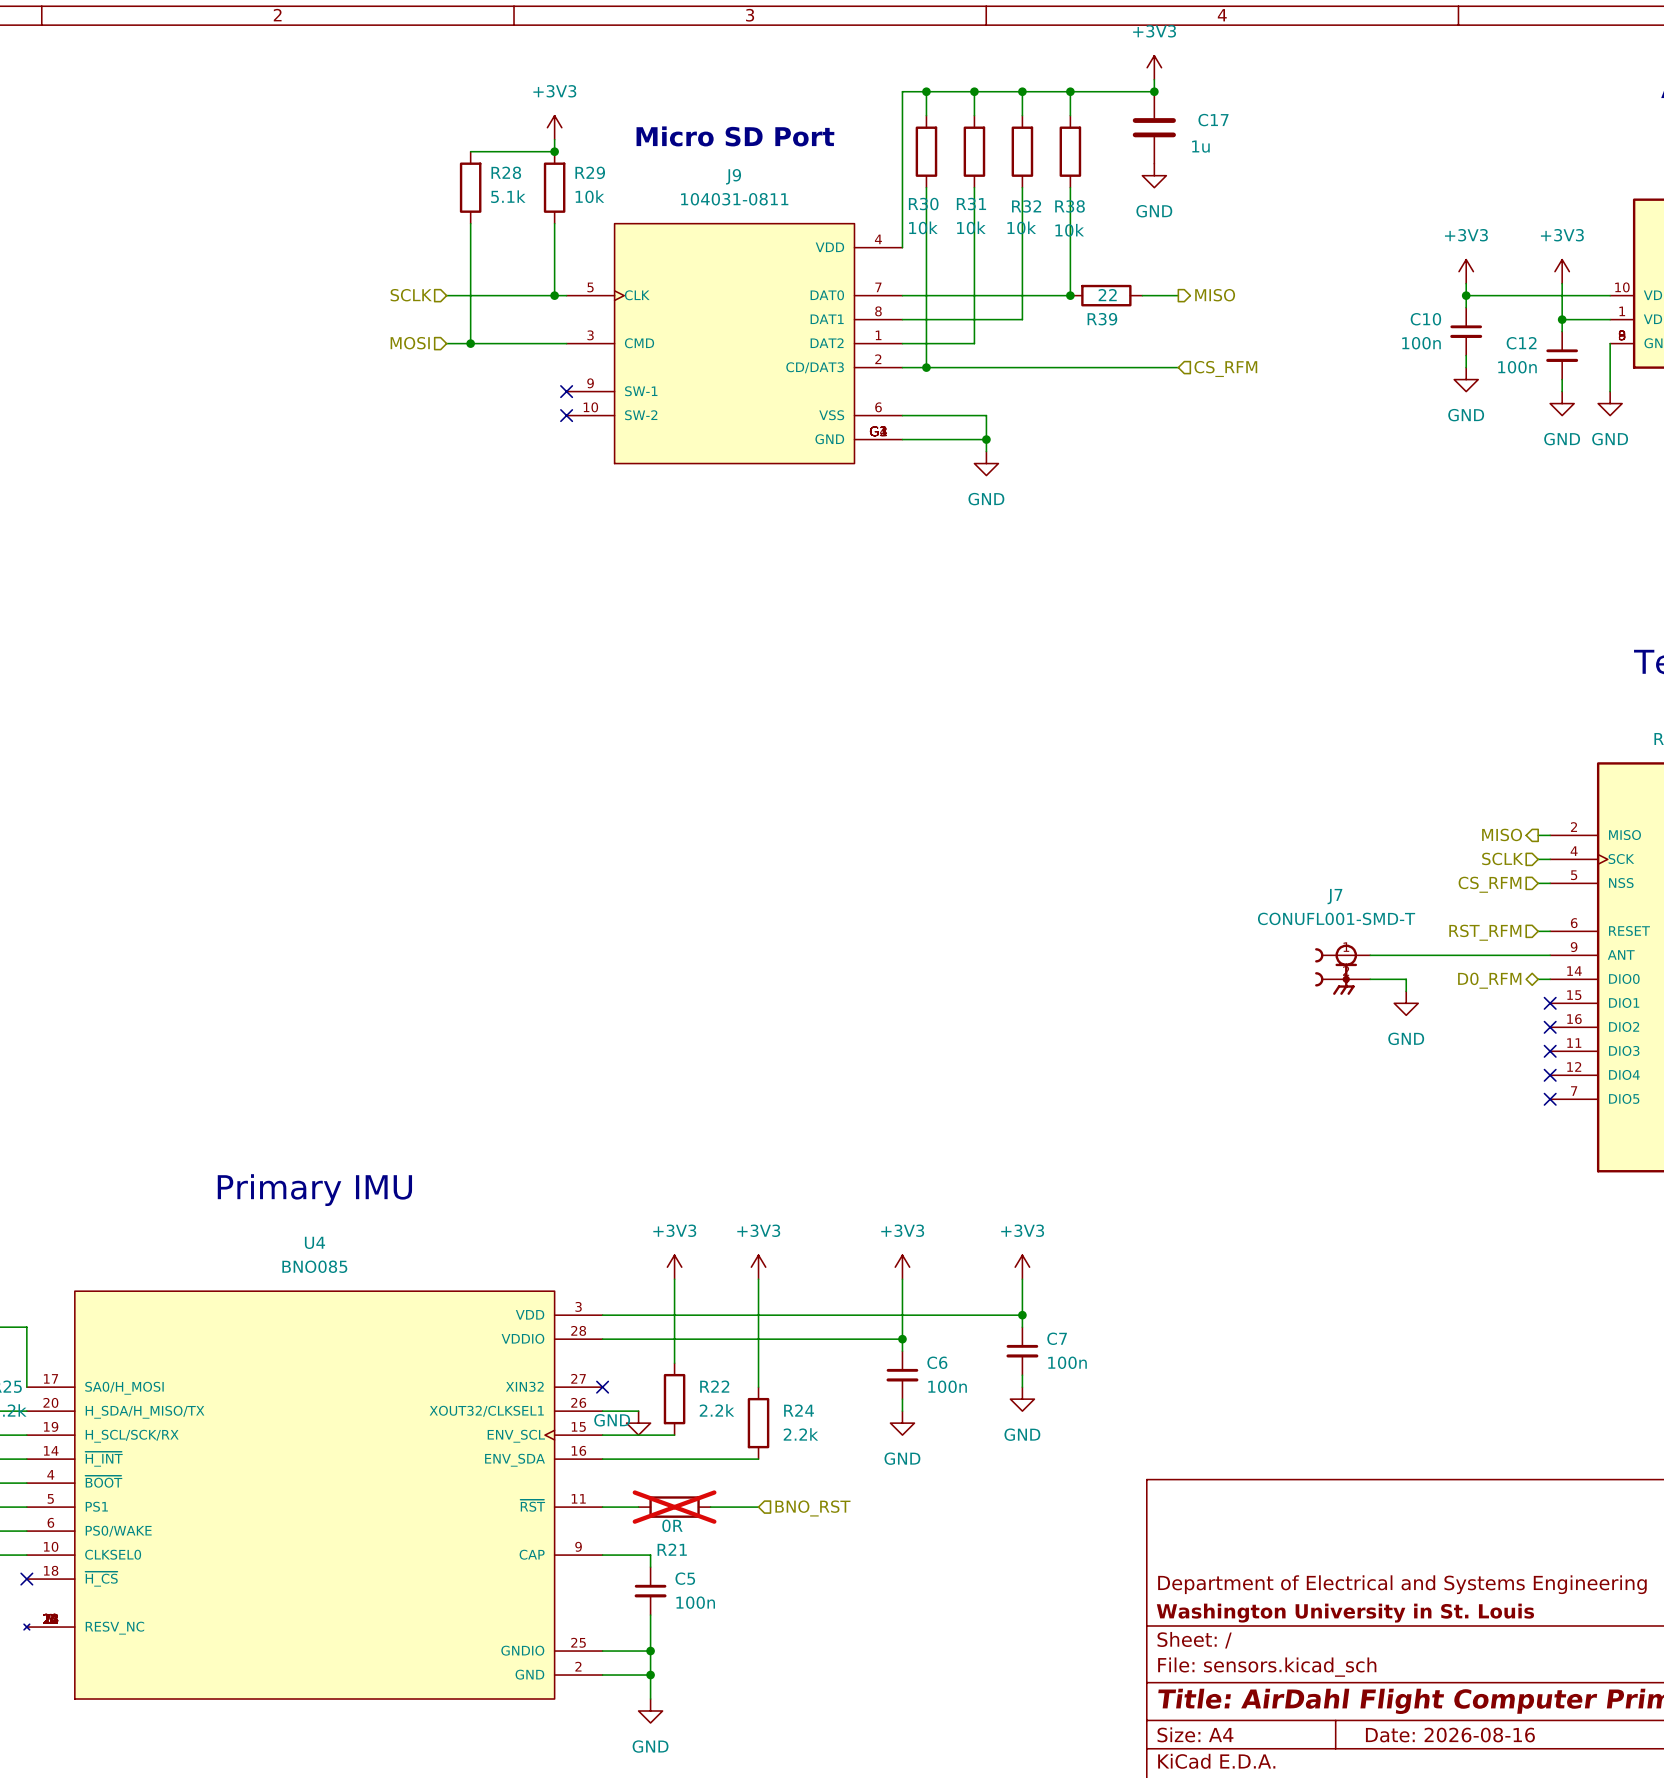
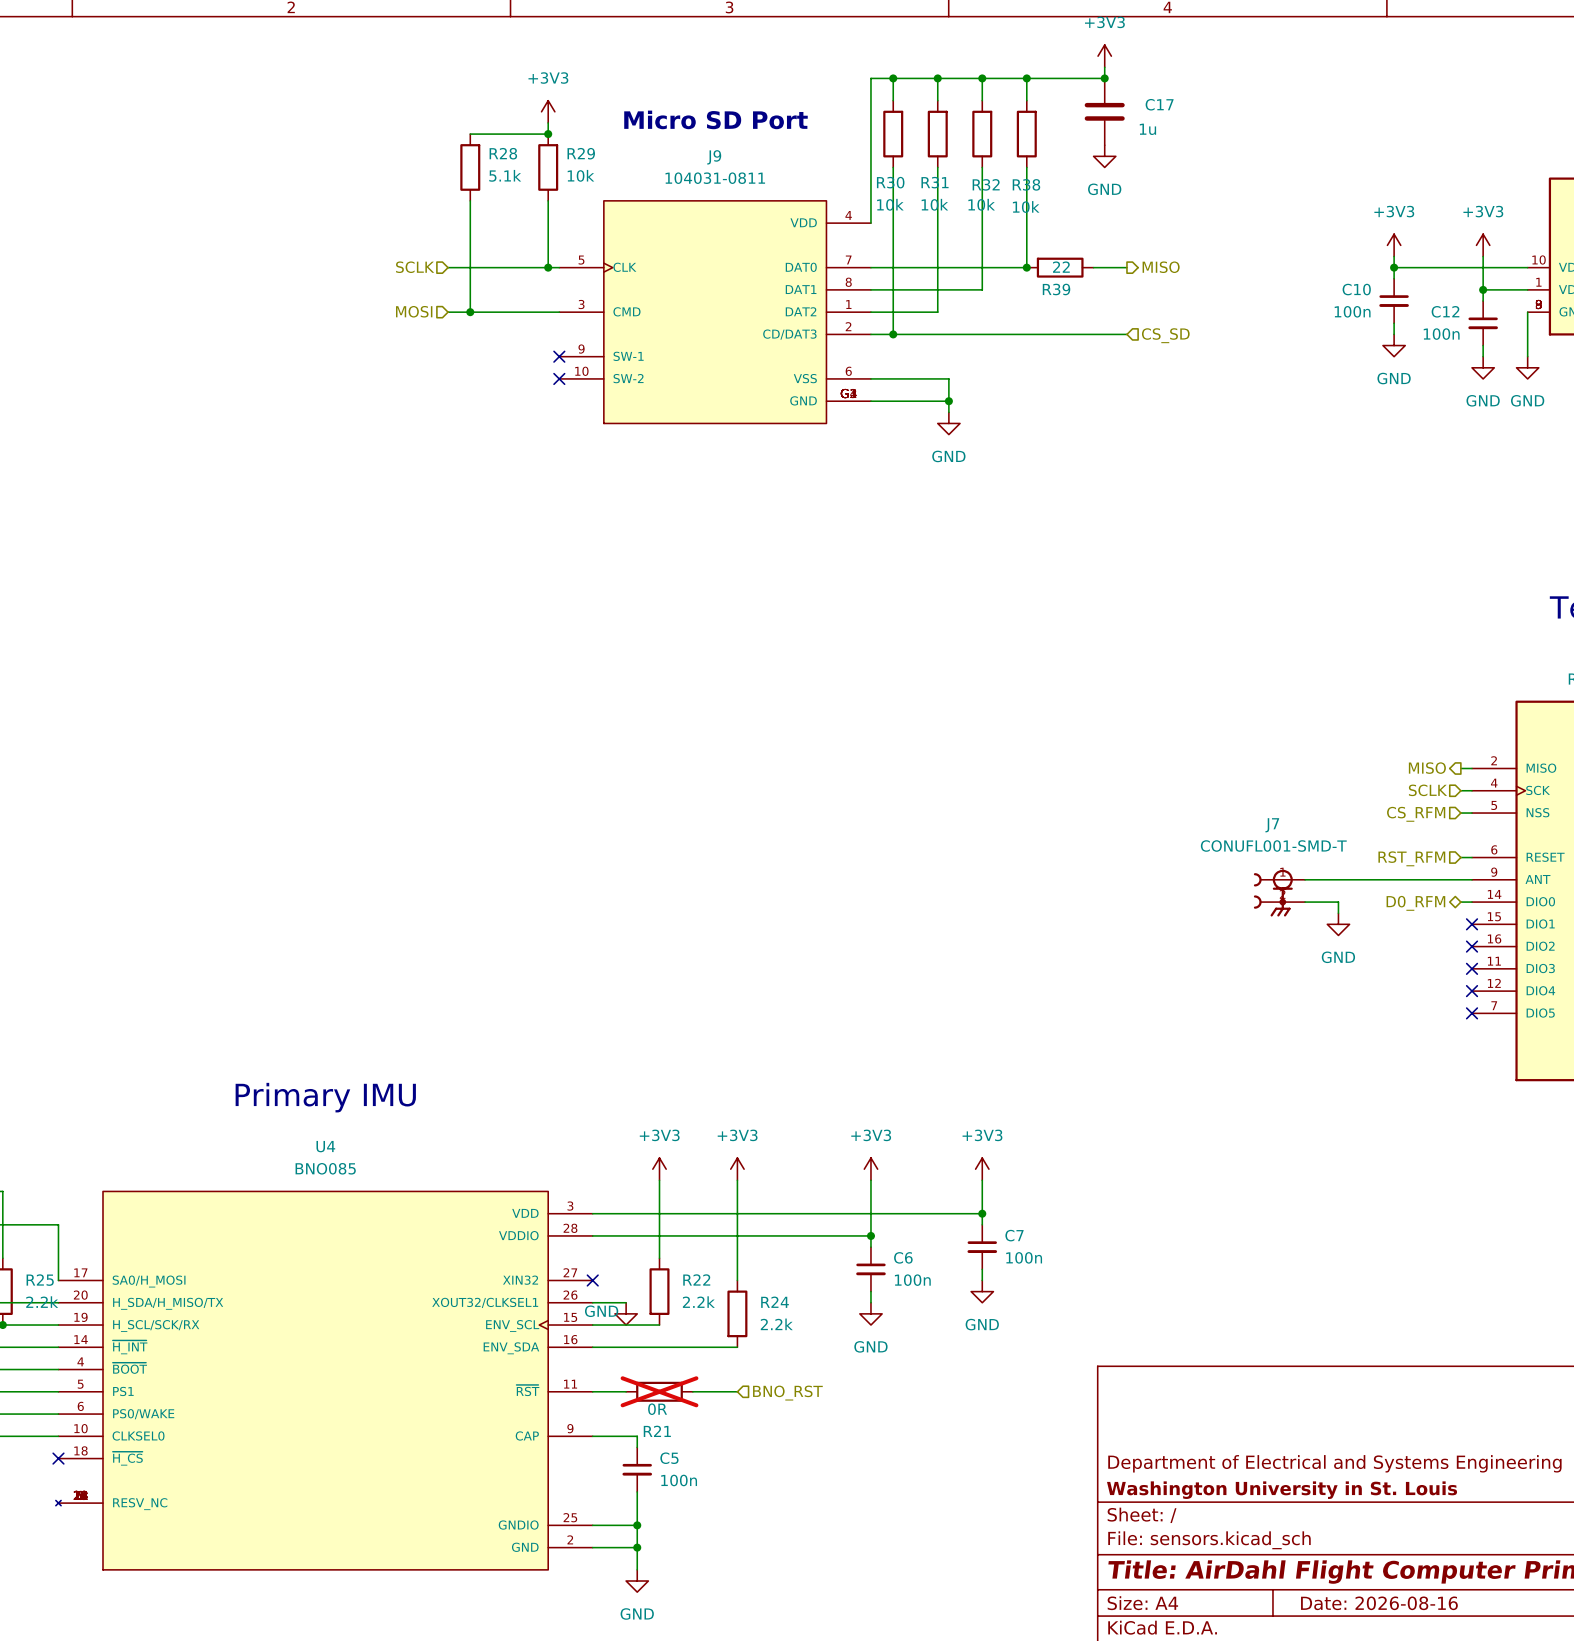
hierarchical label: CS_RFM (1225, 368) -> CS_SD (1165, 335)

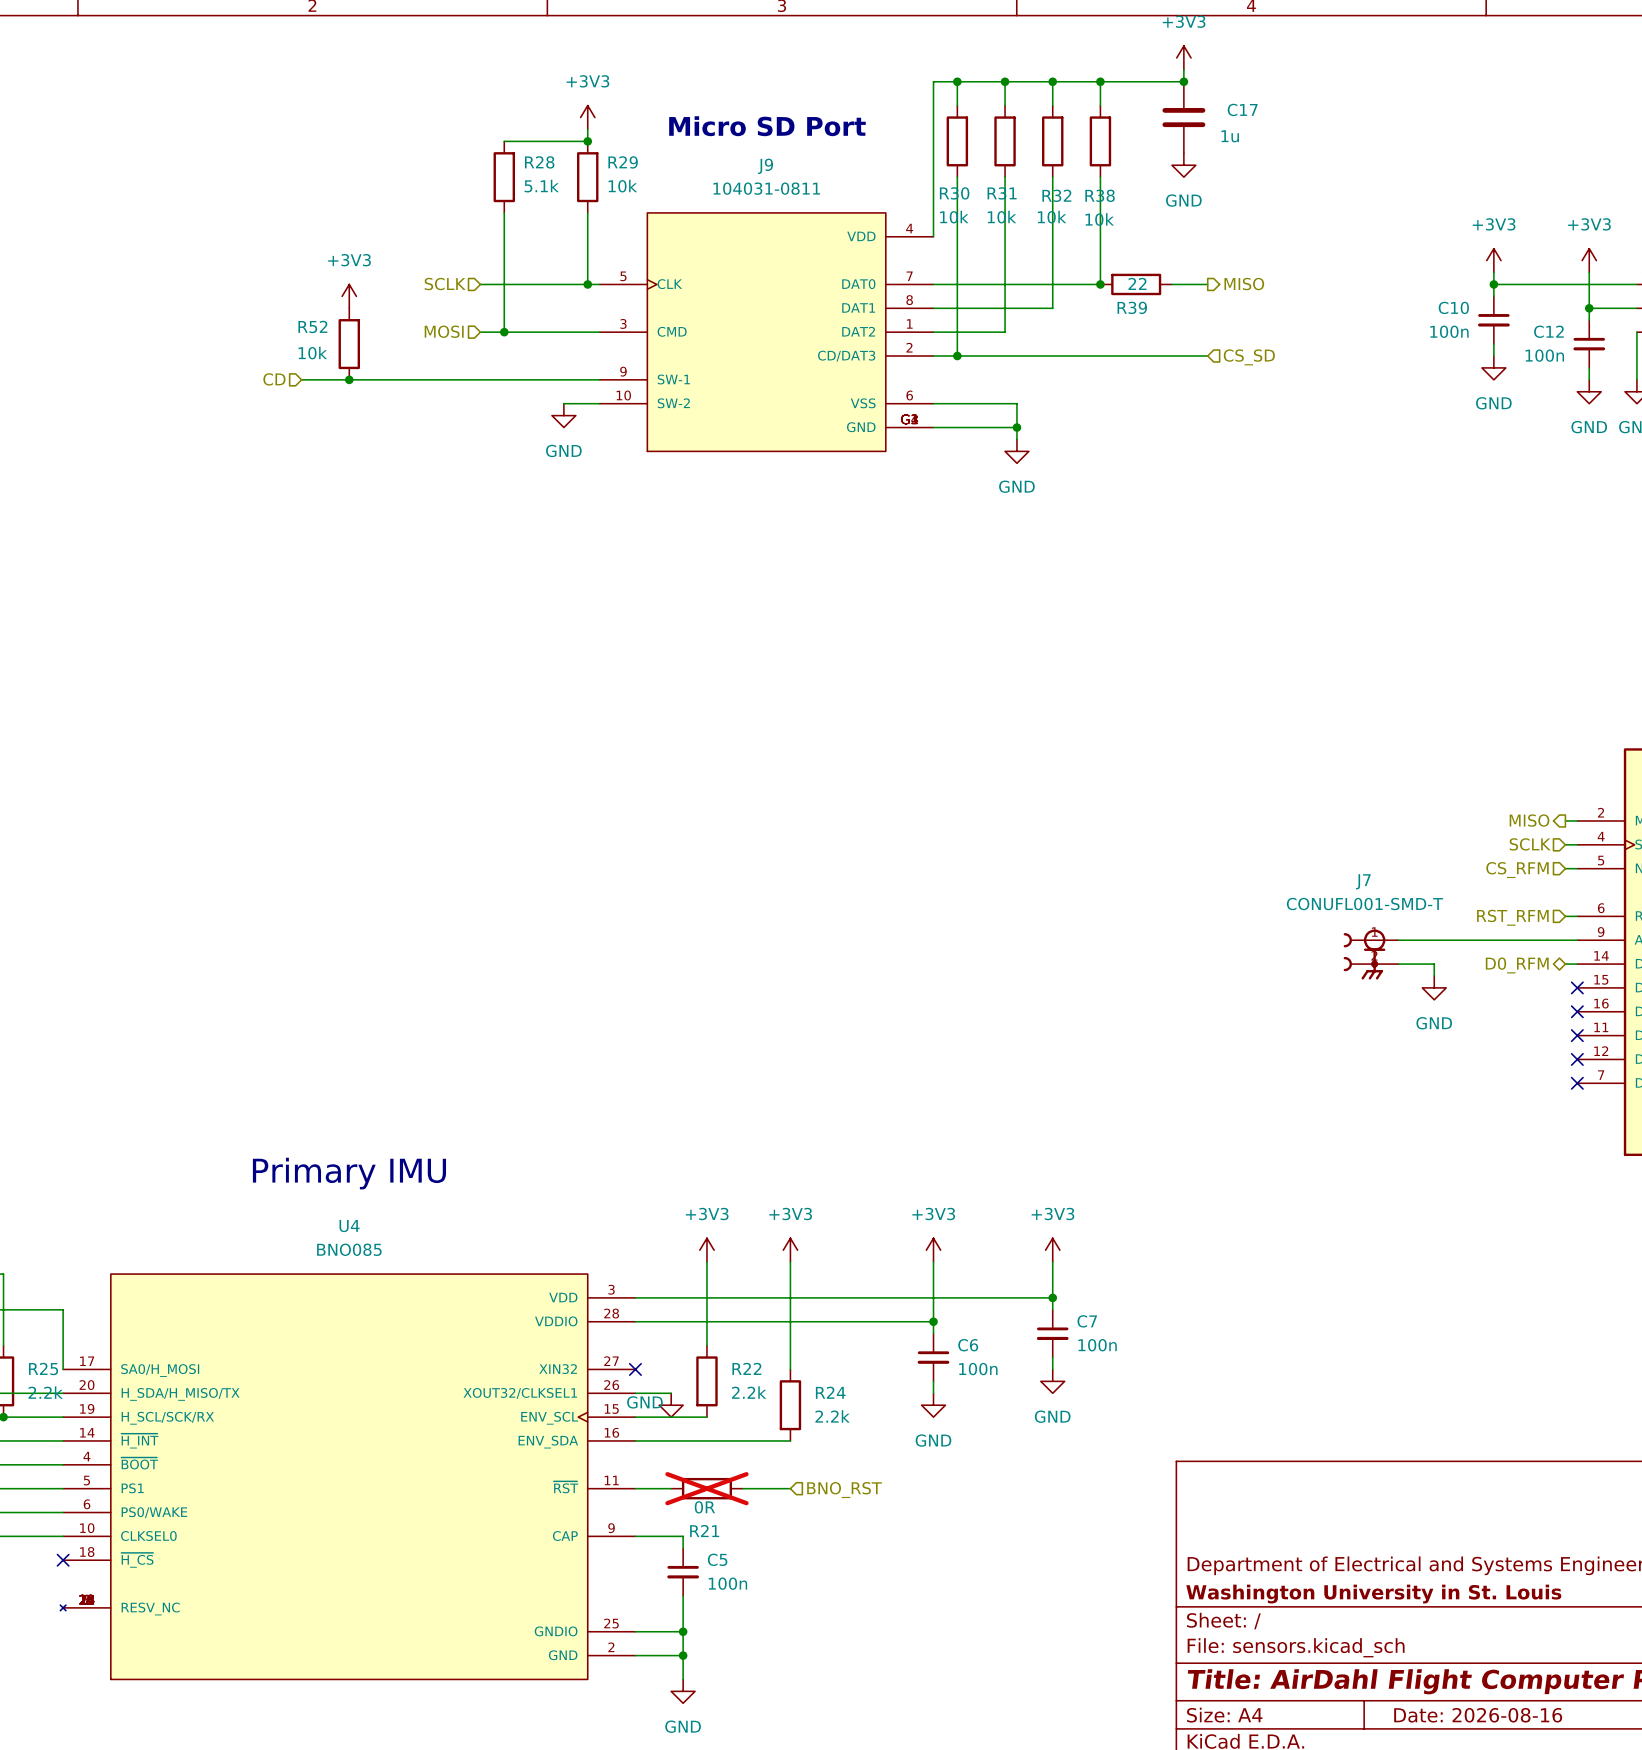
power symbol: none -> +3V3 (349, 296)
R52: none -> 10k (349, 344)
hierarchical label: none -> CD (274, 379)
wire: none -> (301, 379) (599, 379)
junction: none -> (349, 379)
no-connect mark: (559, 356) -> none
wire: none -> (563, 403) (599, 403)
no-connect mark: (559, 378) -> none
power symbol: none -> GND (563, 415)

